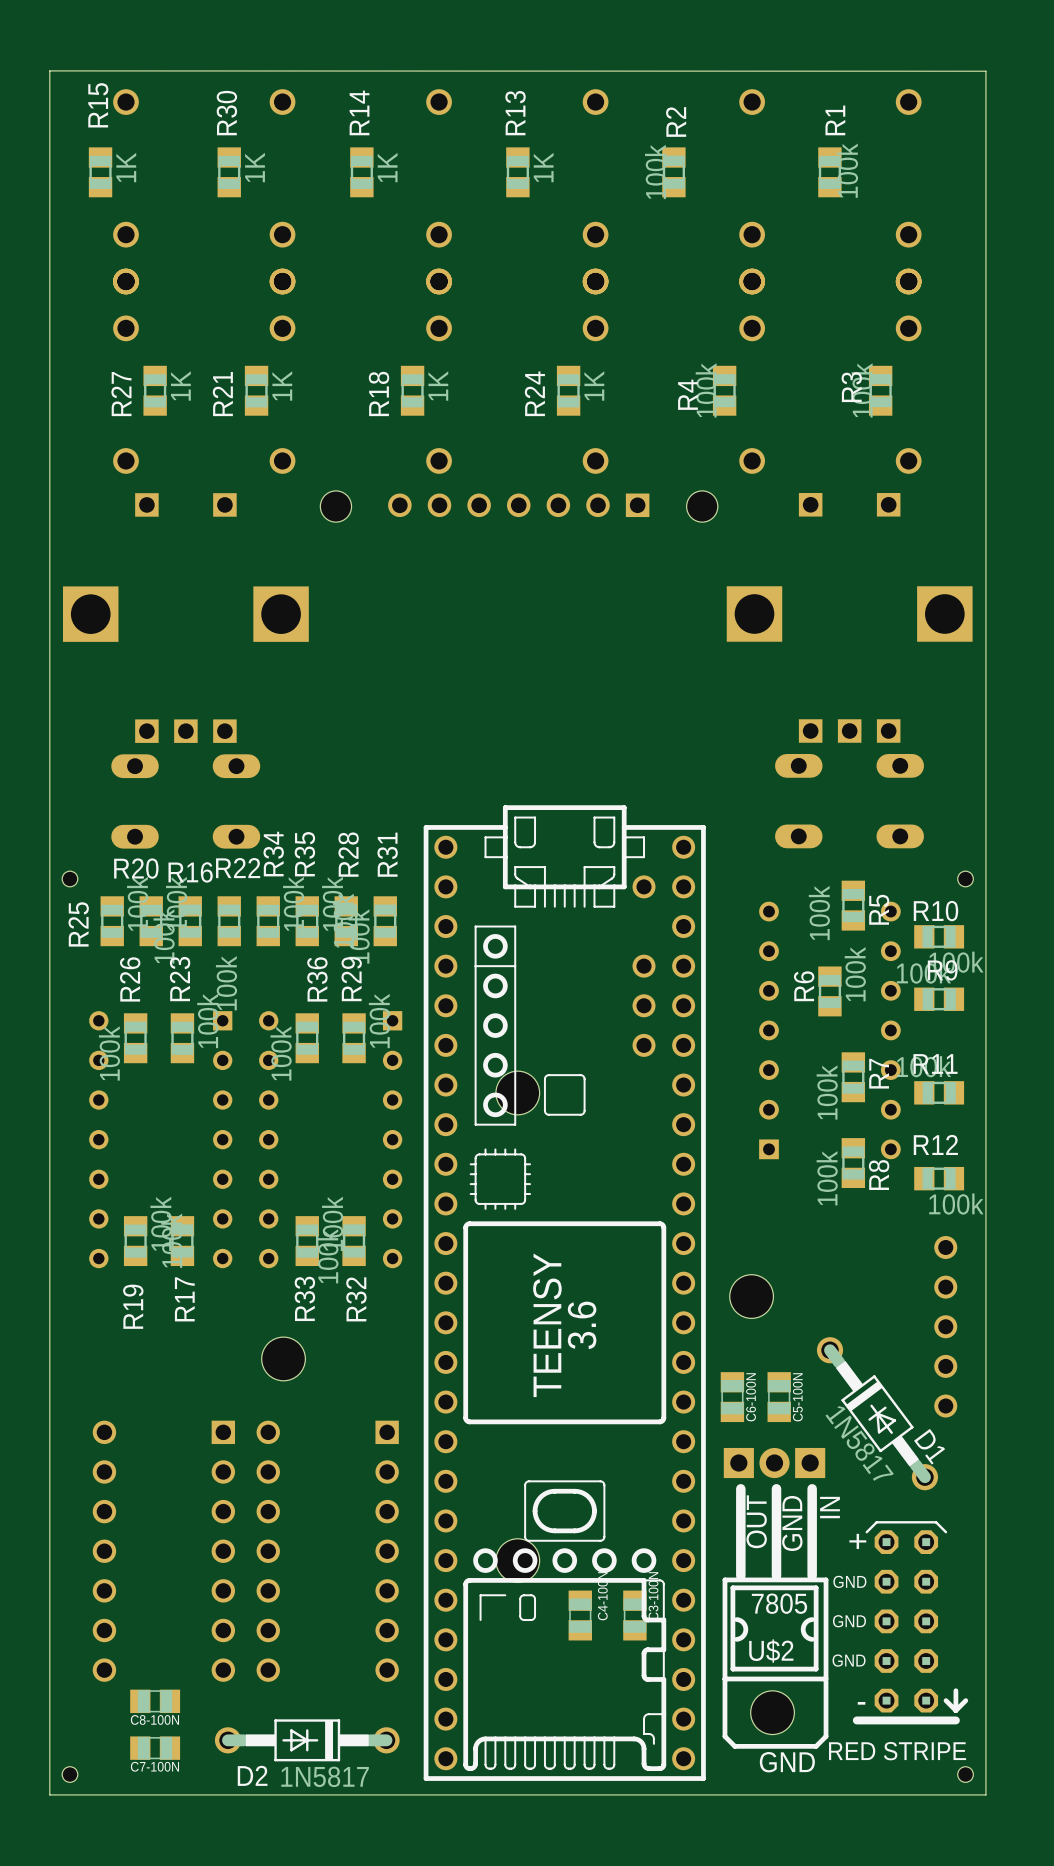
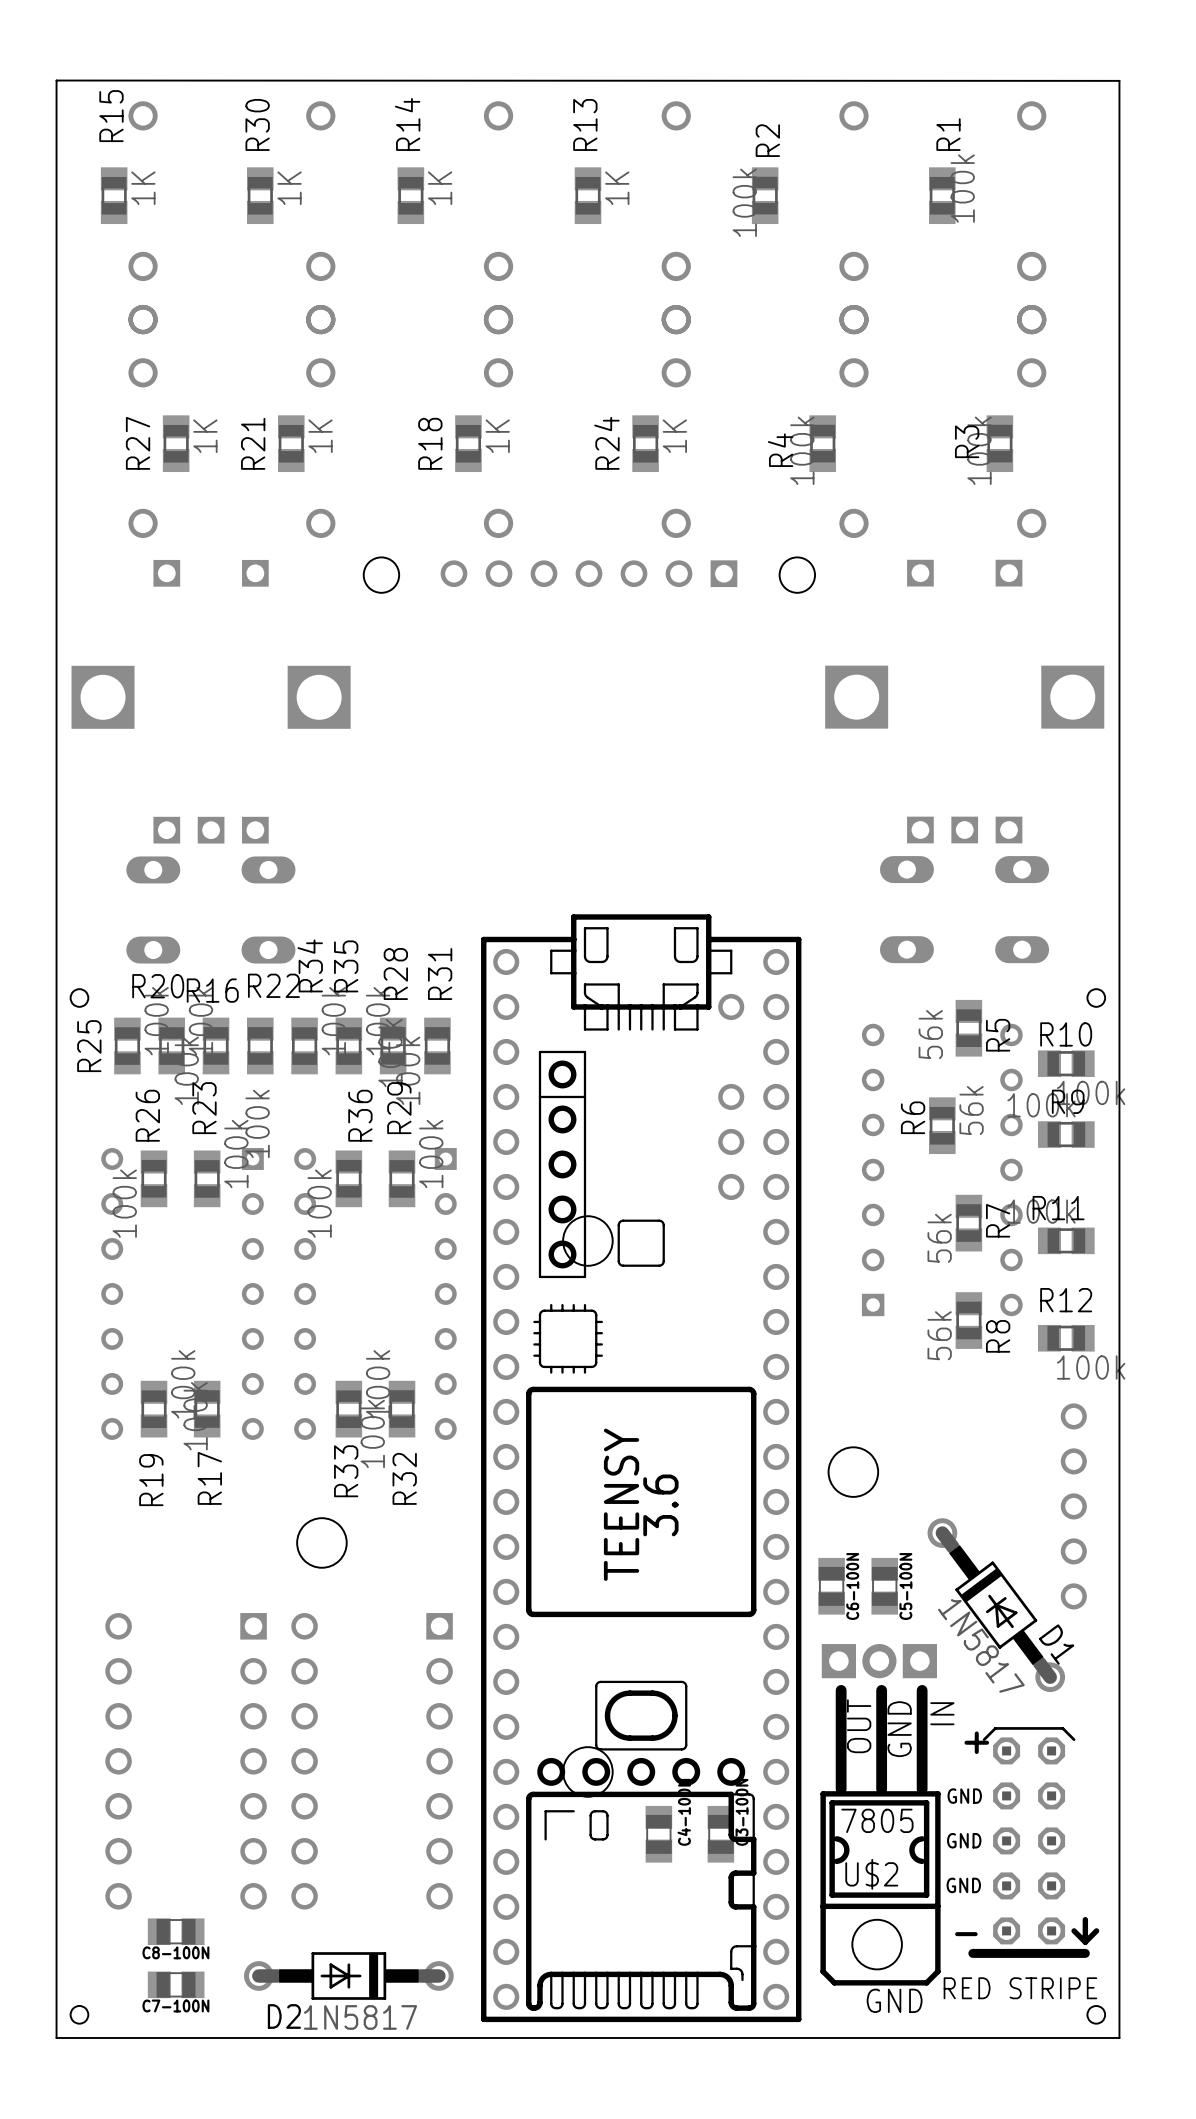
R5 value: 100k (819, 913) -> 56k (930, 1034)
R6 value: 100k (855, 974) -> 56k (971, 1110)
R7 value: 100k (827, 1092) -> 56k (939, 1238)
R8 value: 100k (827, 1178) -> 56k (939, 1335)

